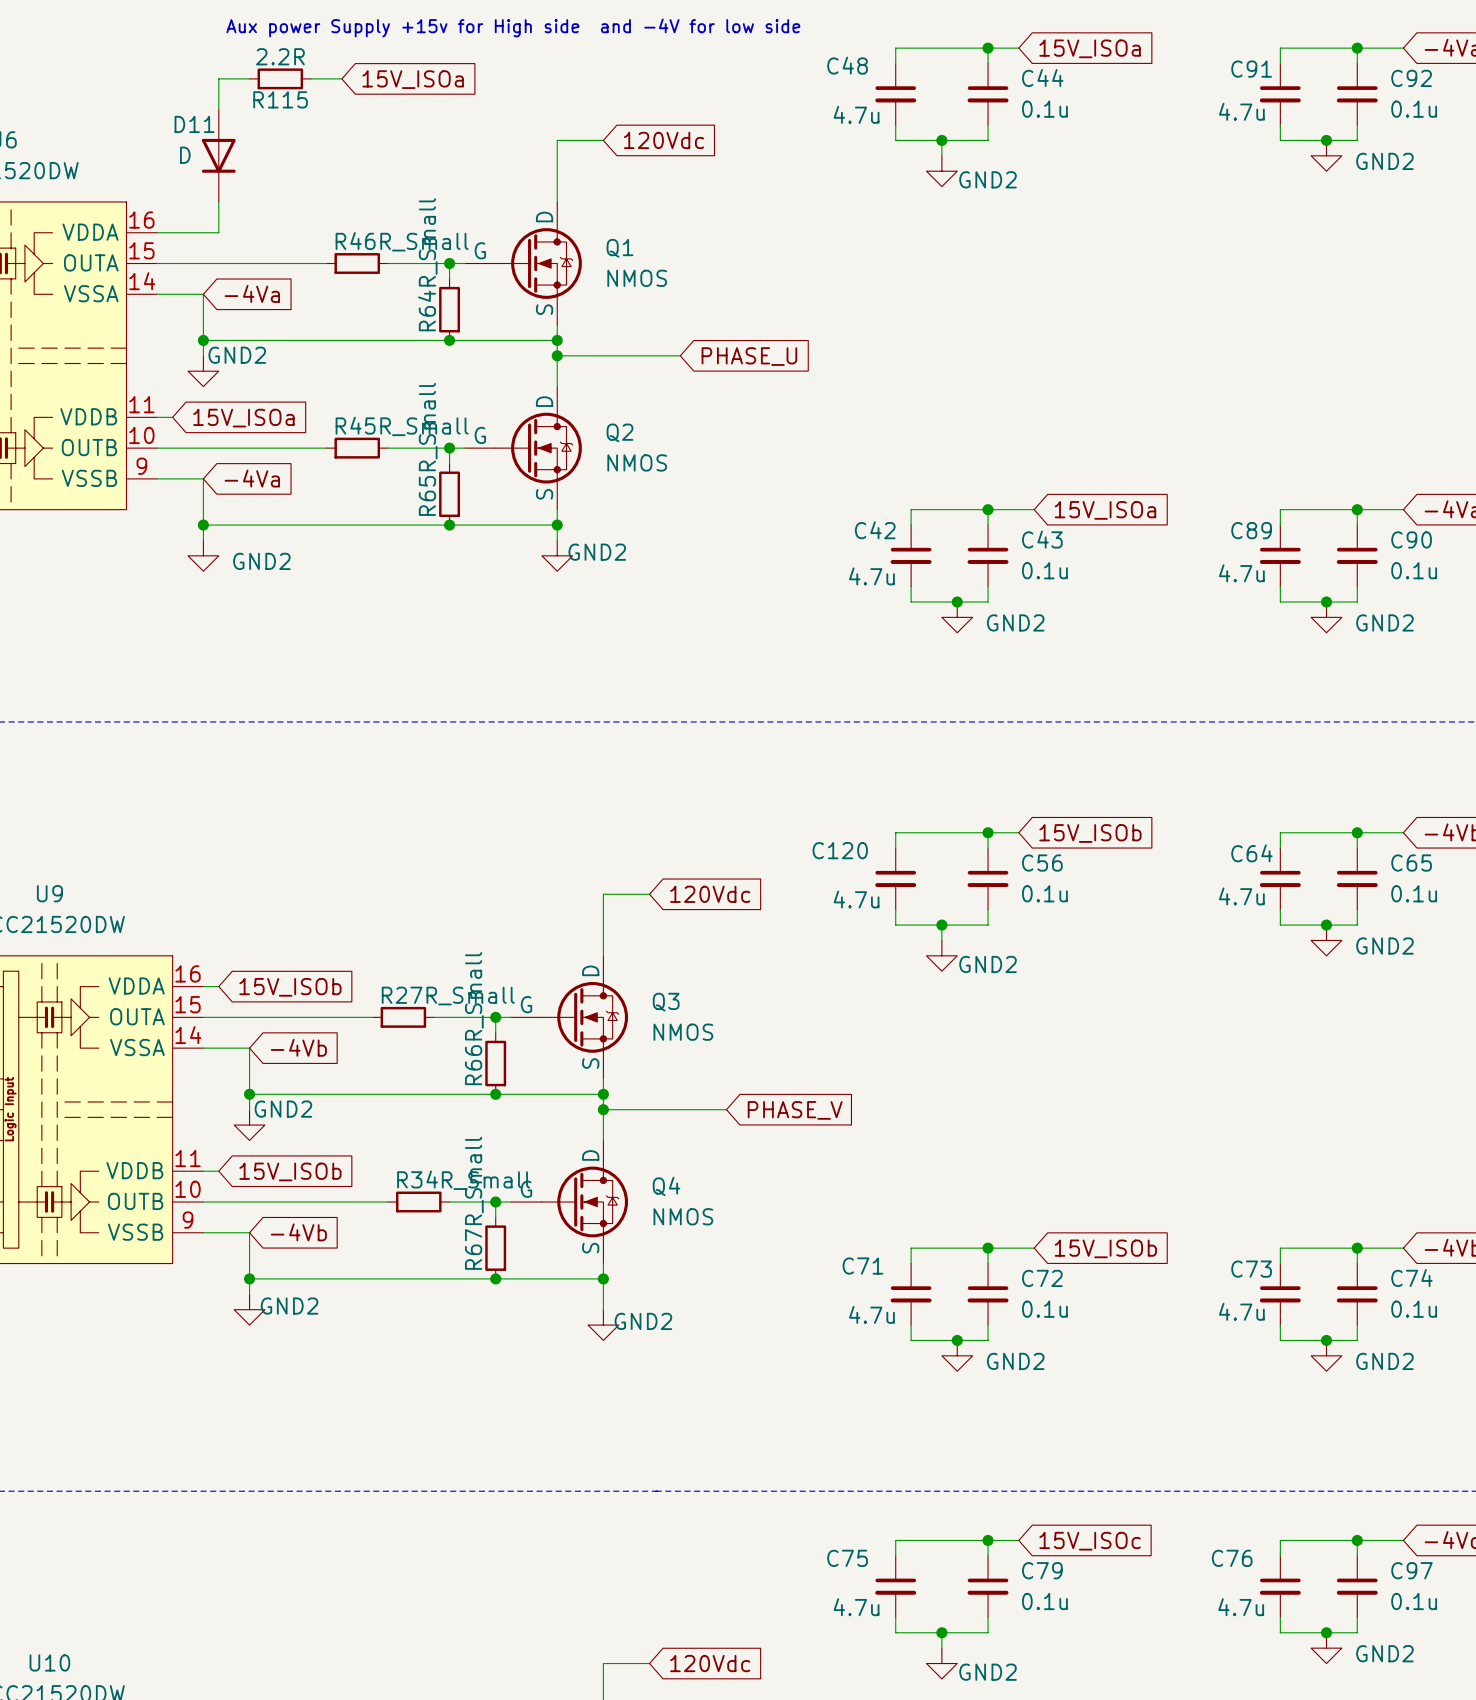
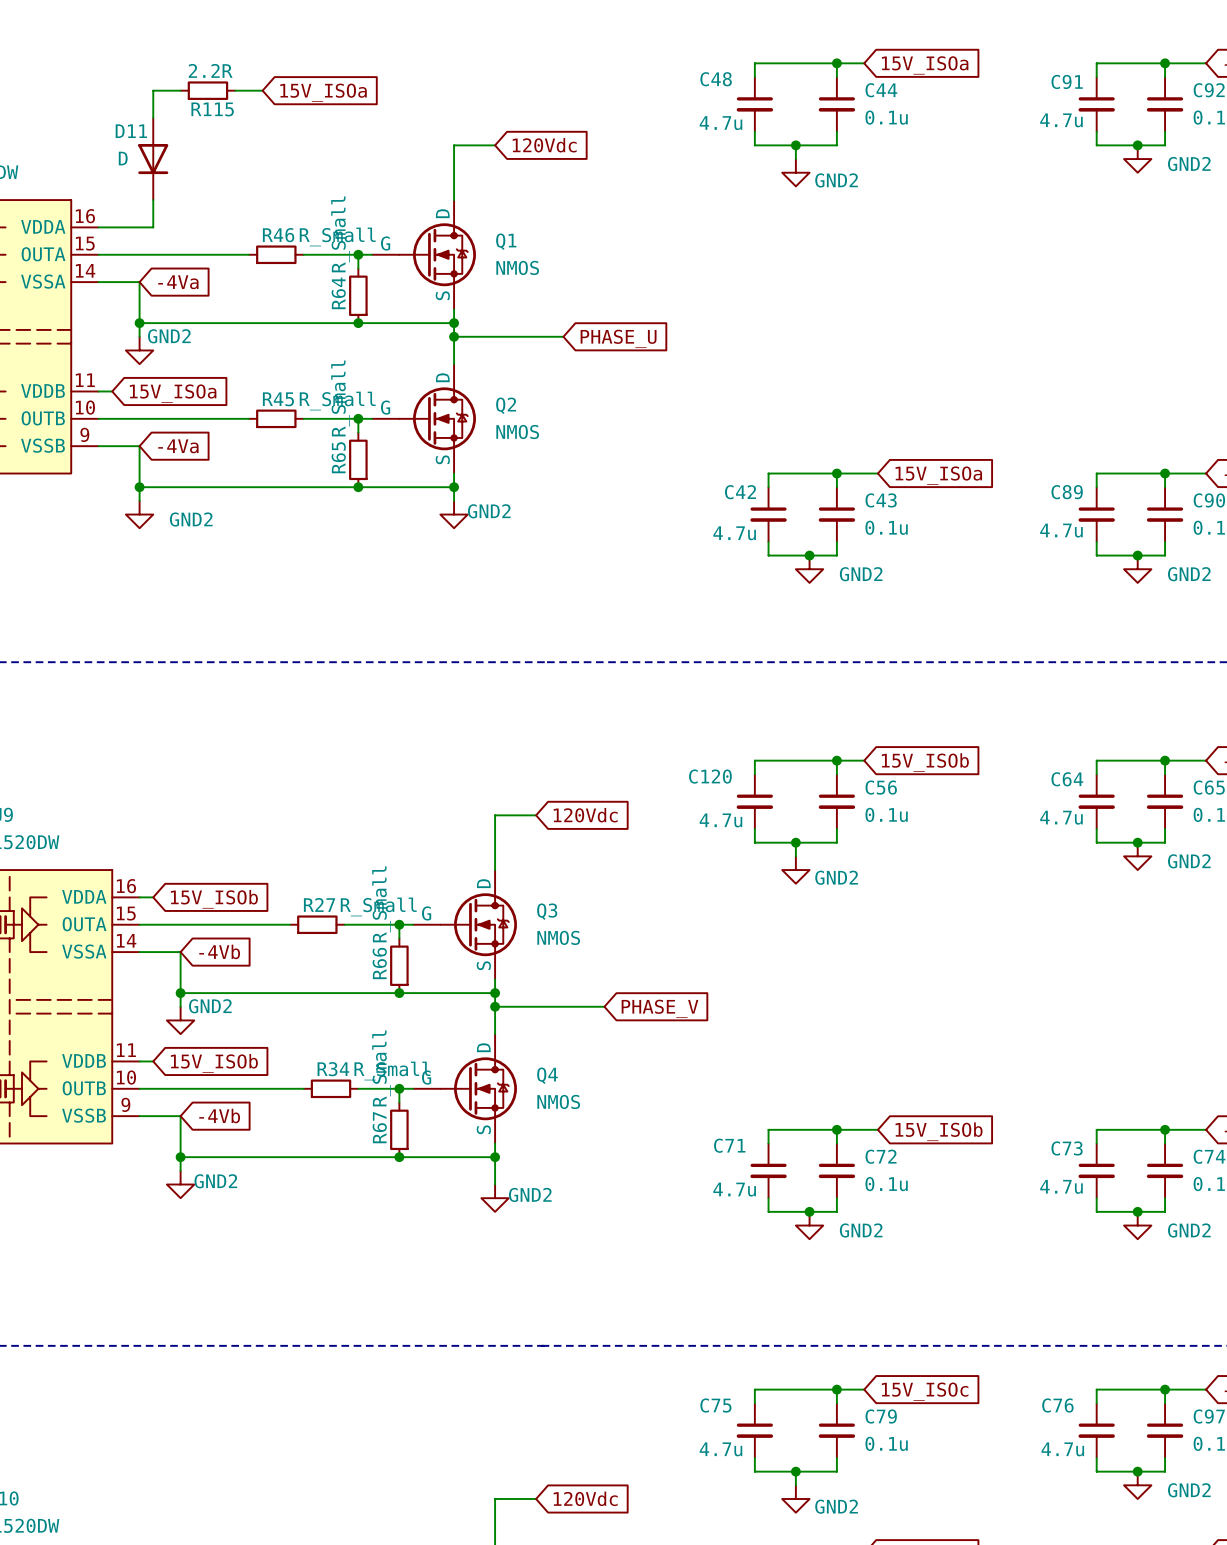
text: Aux power Supply +15v for High side and -4V for low side (513, 27) -> none

